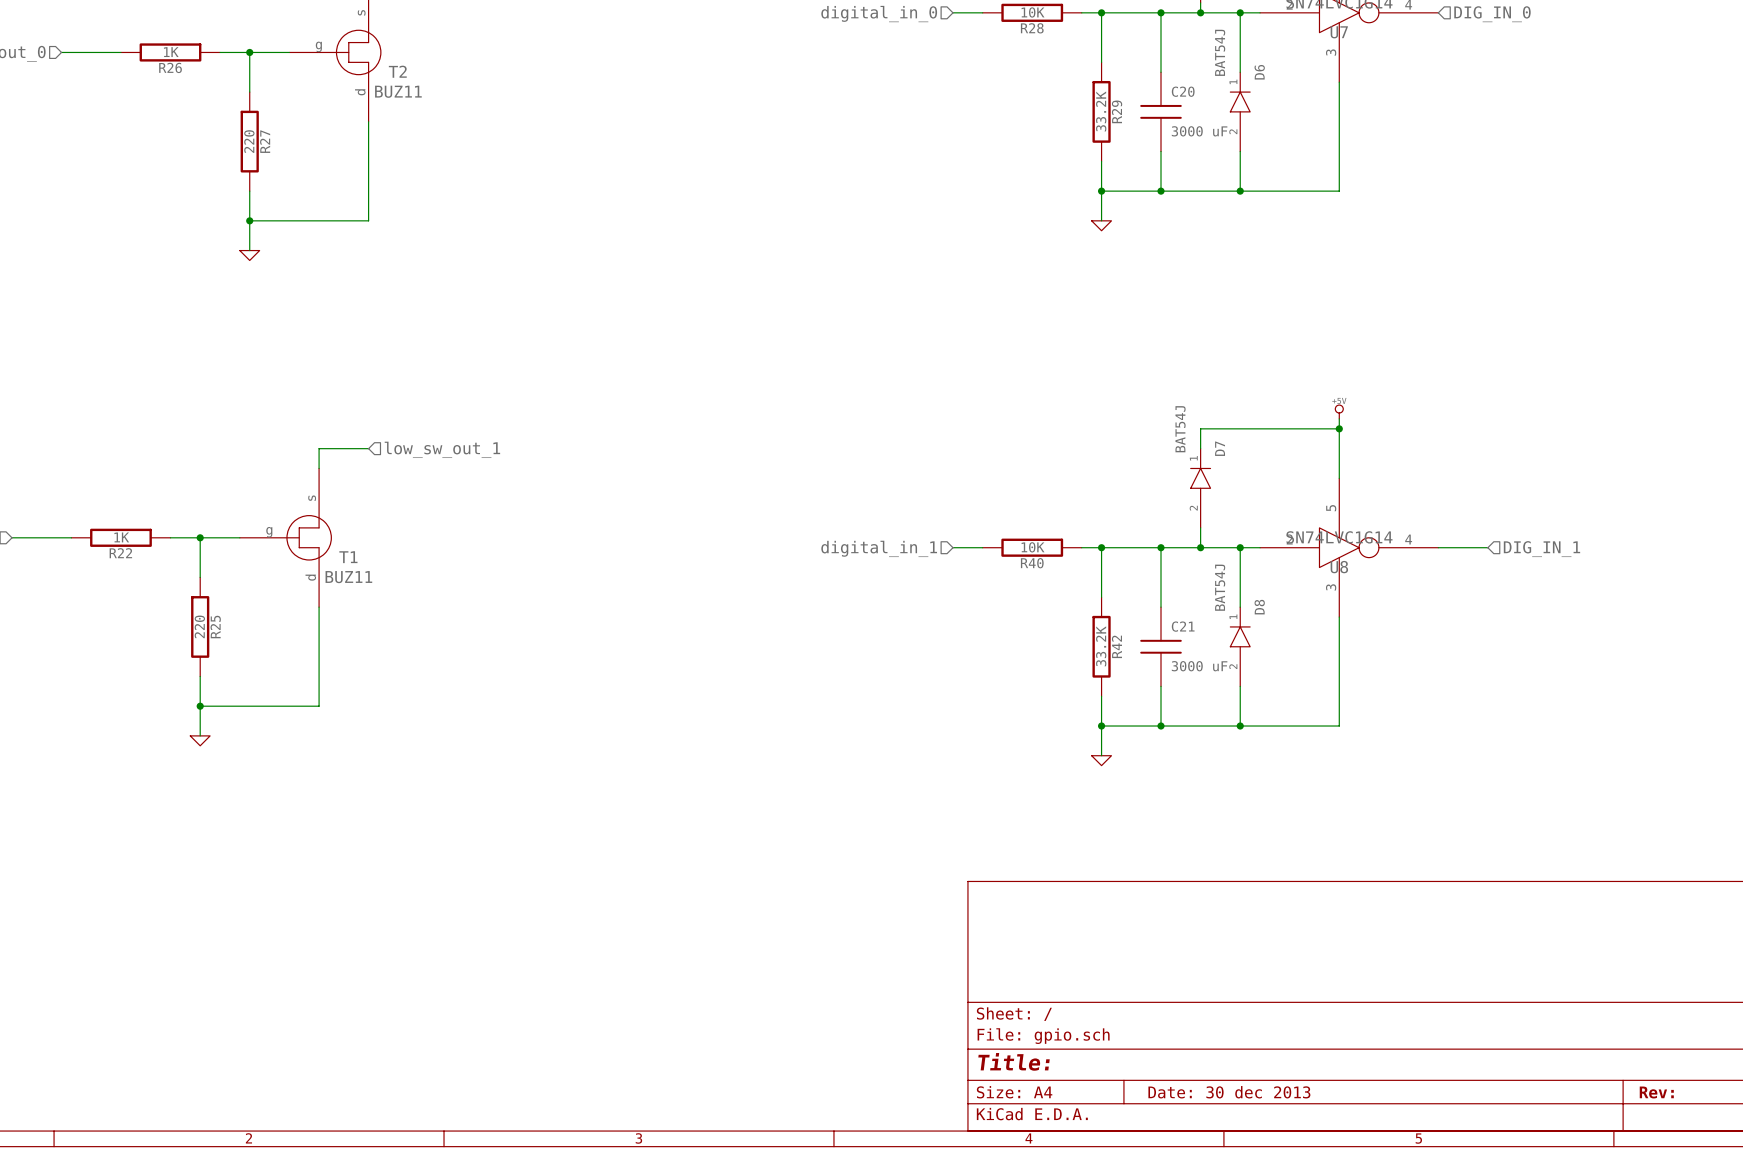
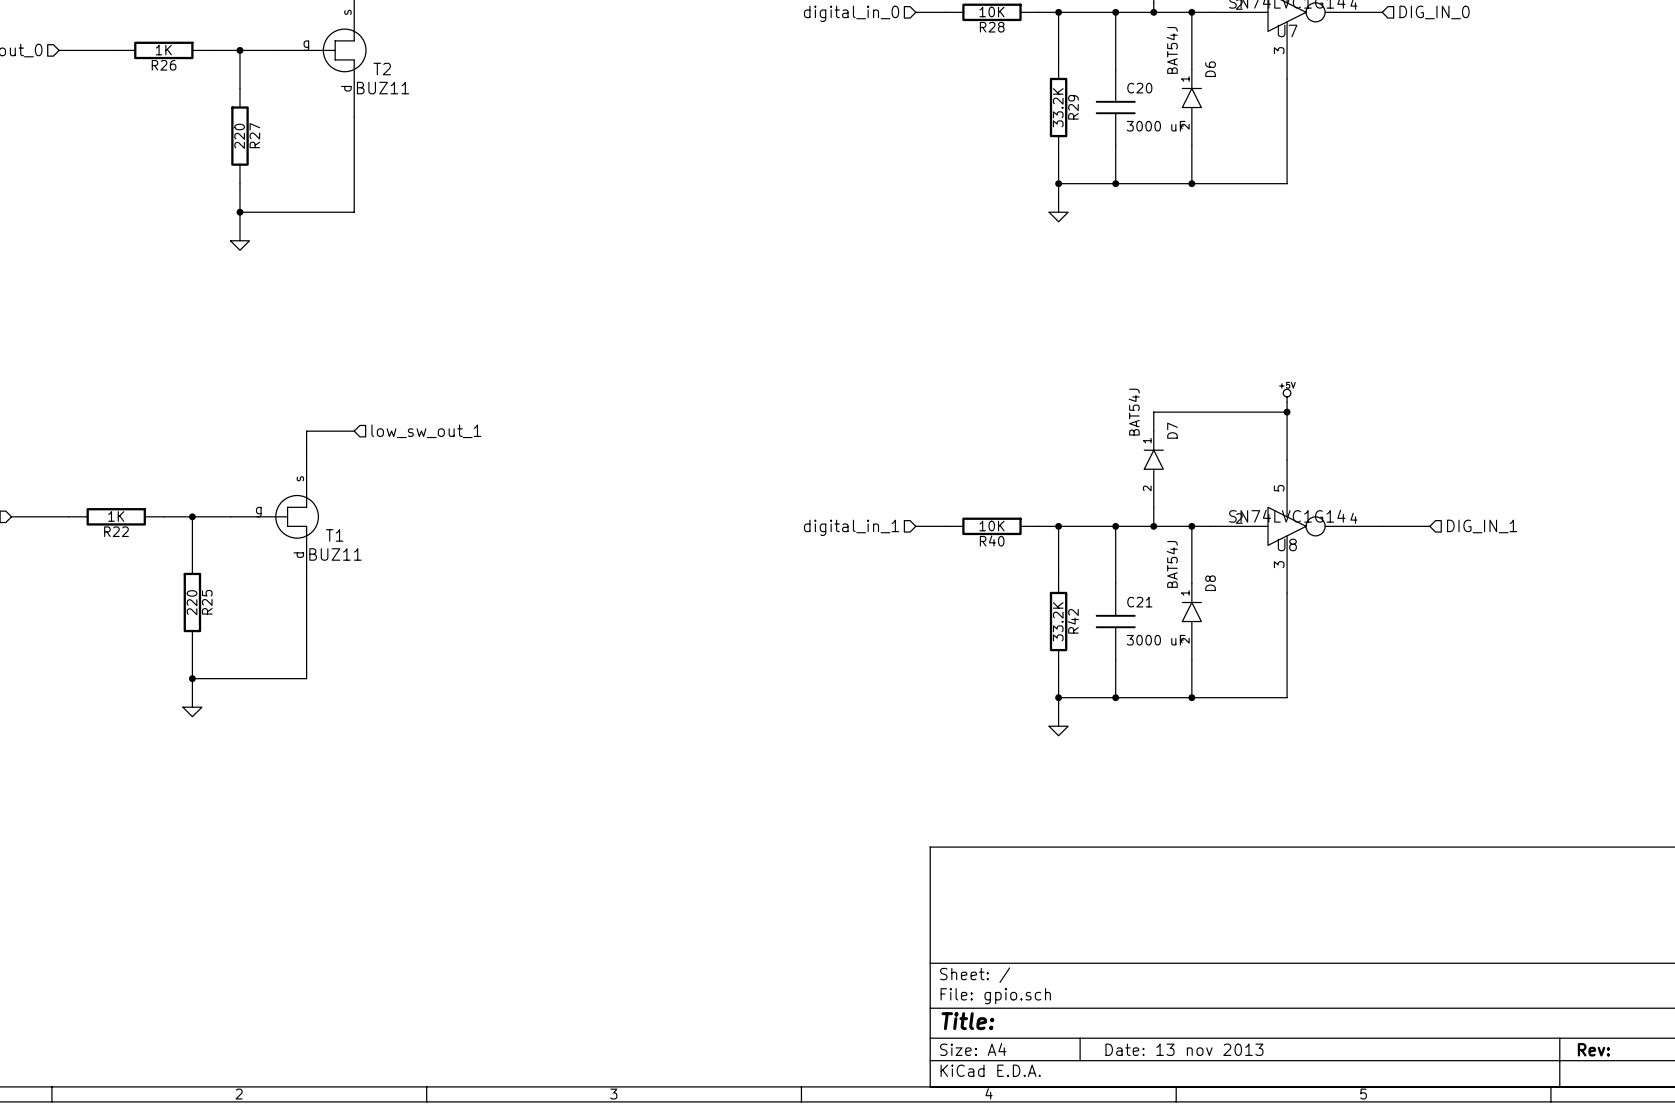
title block: Date: 30 dec 2013 (1229, 1092) -> Date: 13 nov 2013 (1184, 1049)

